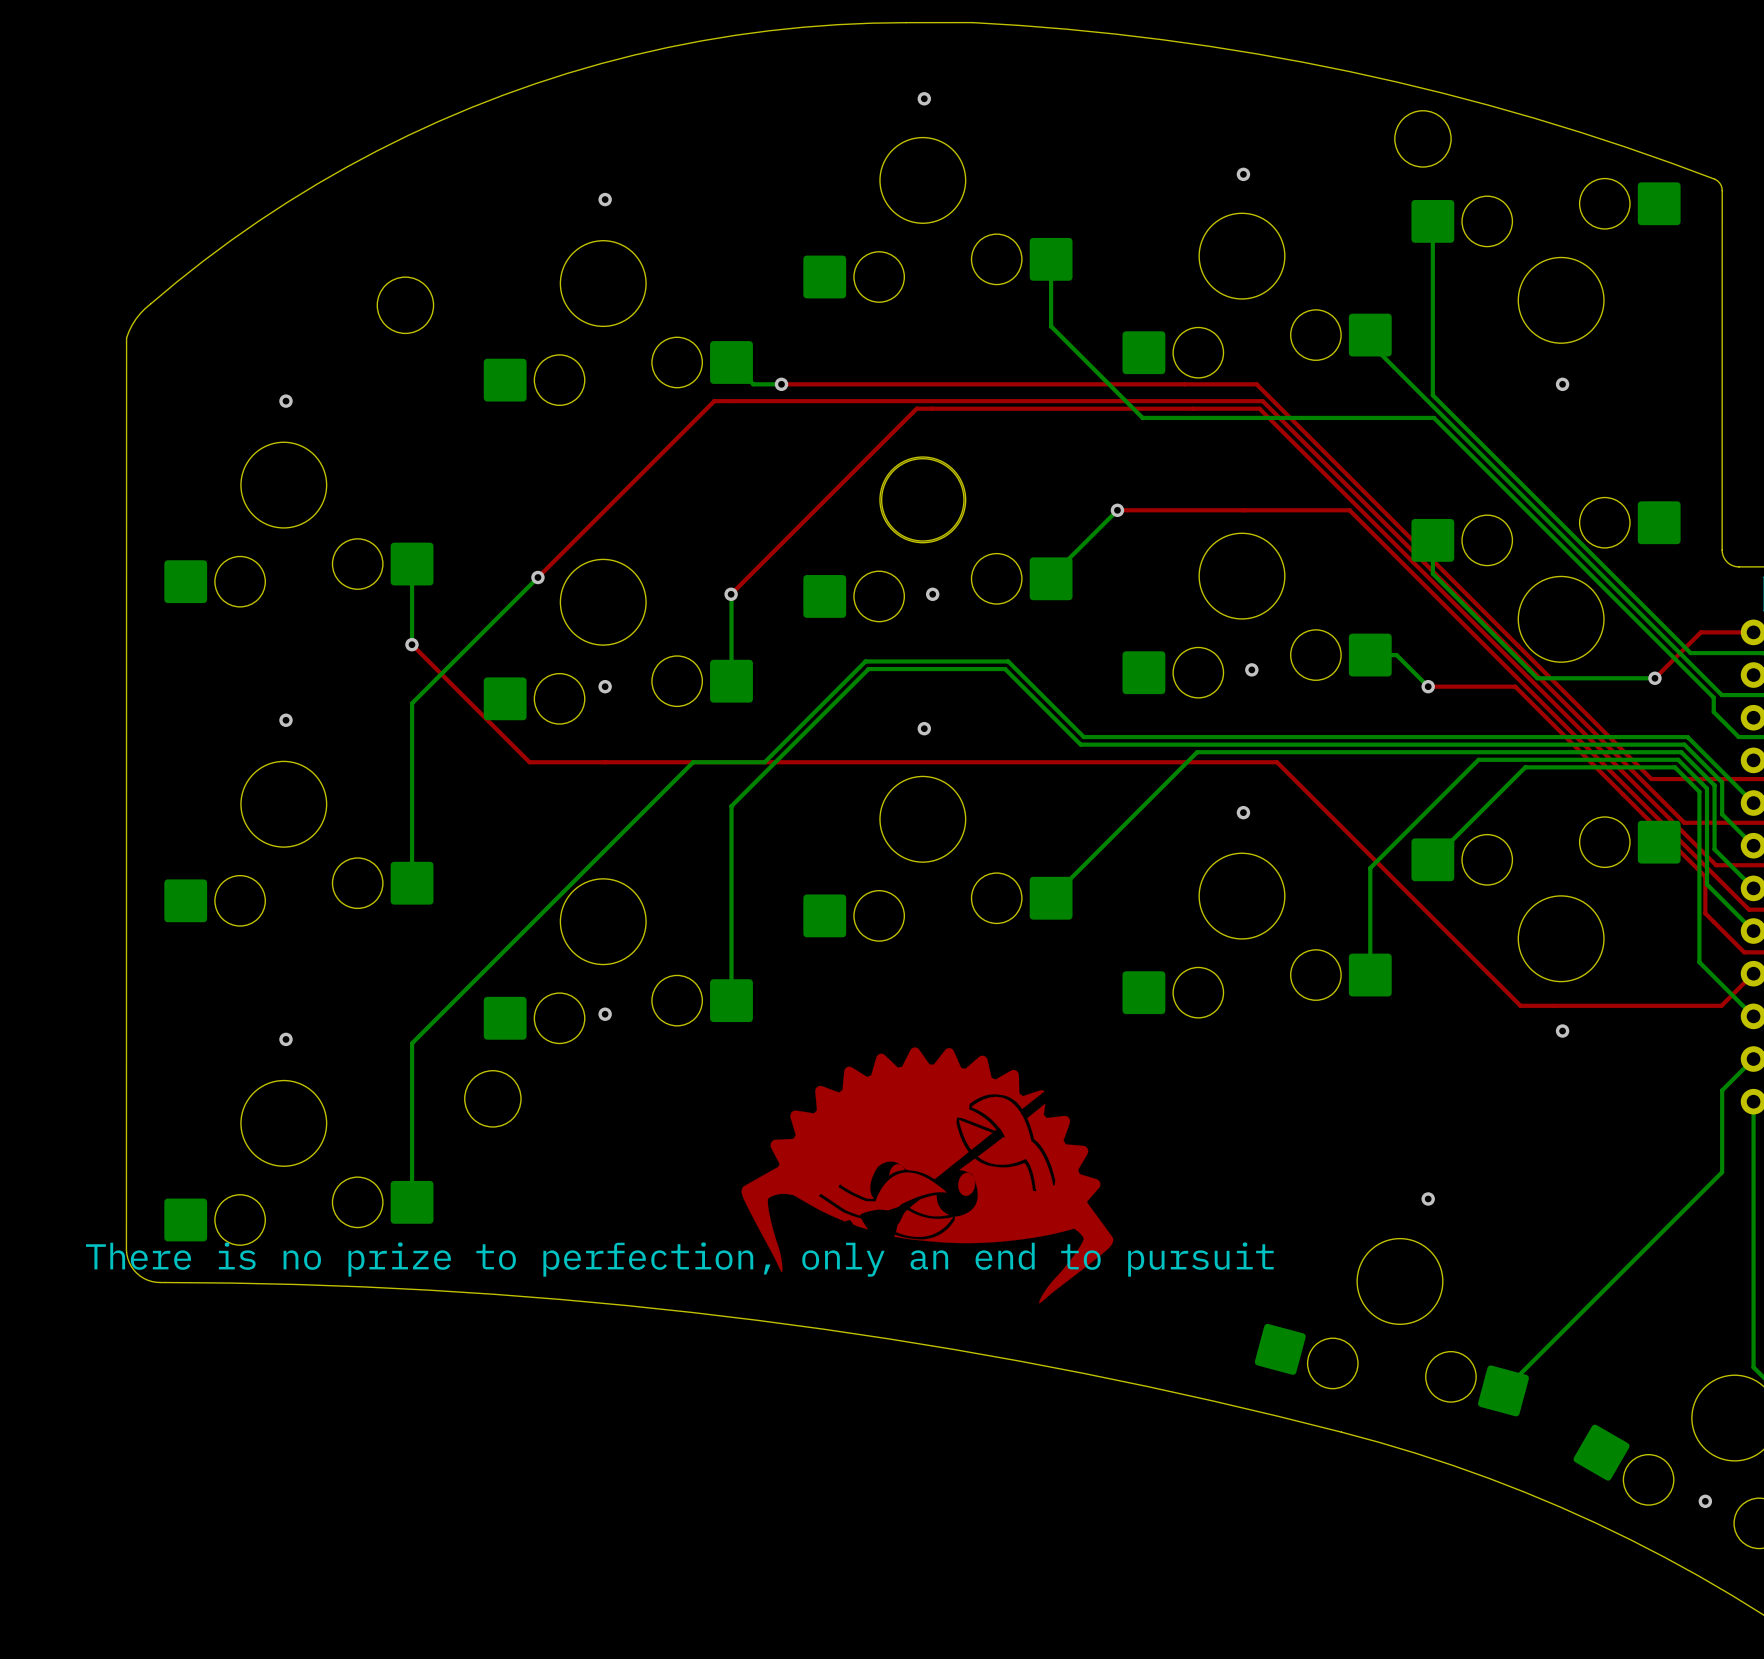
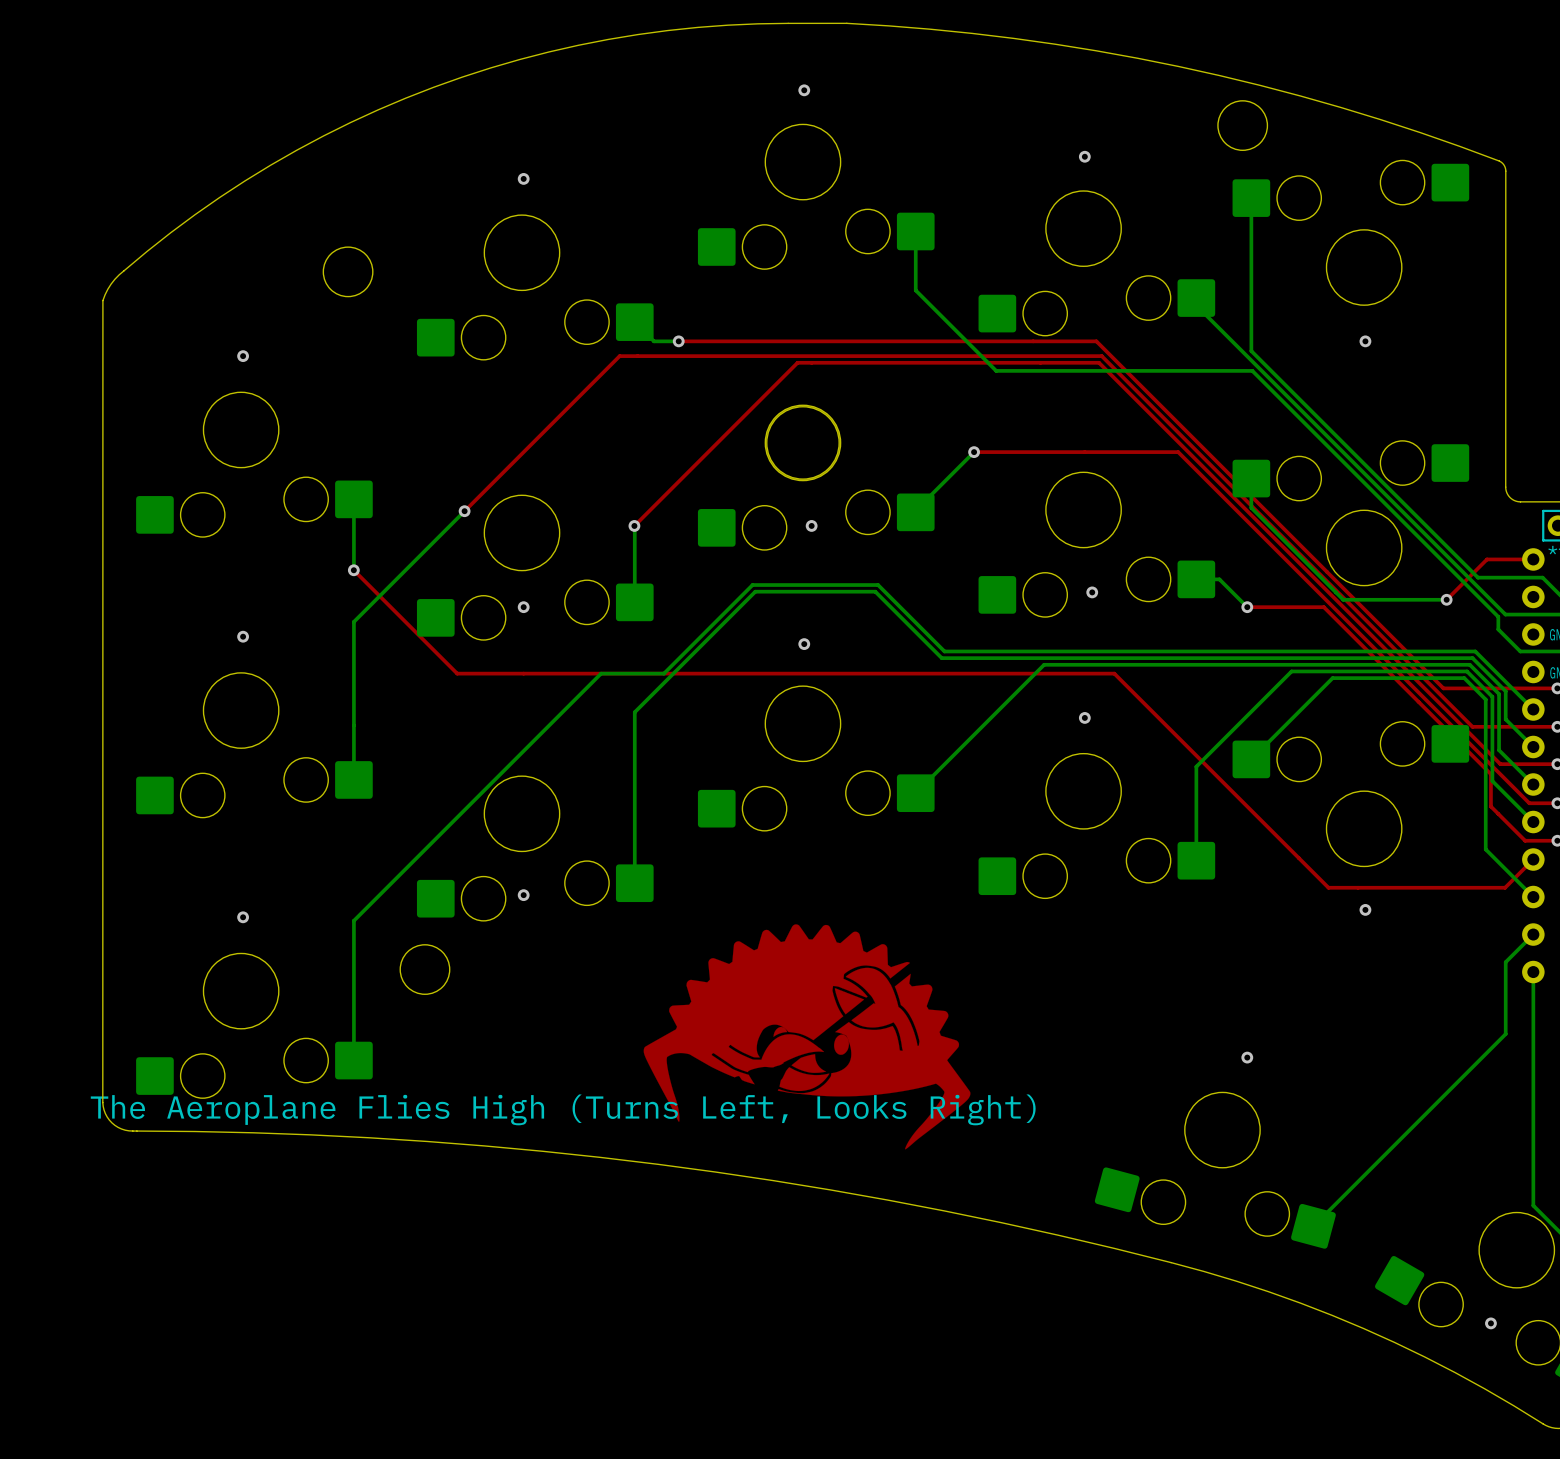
text: none -> The Aeroplane Flies High (Turns Left, Looks Right) (563, 1109)
text: There is no prize to perfection, only an end to pursuit (679, 1259) -> none

